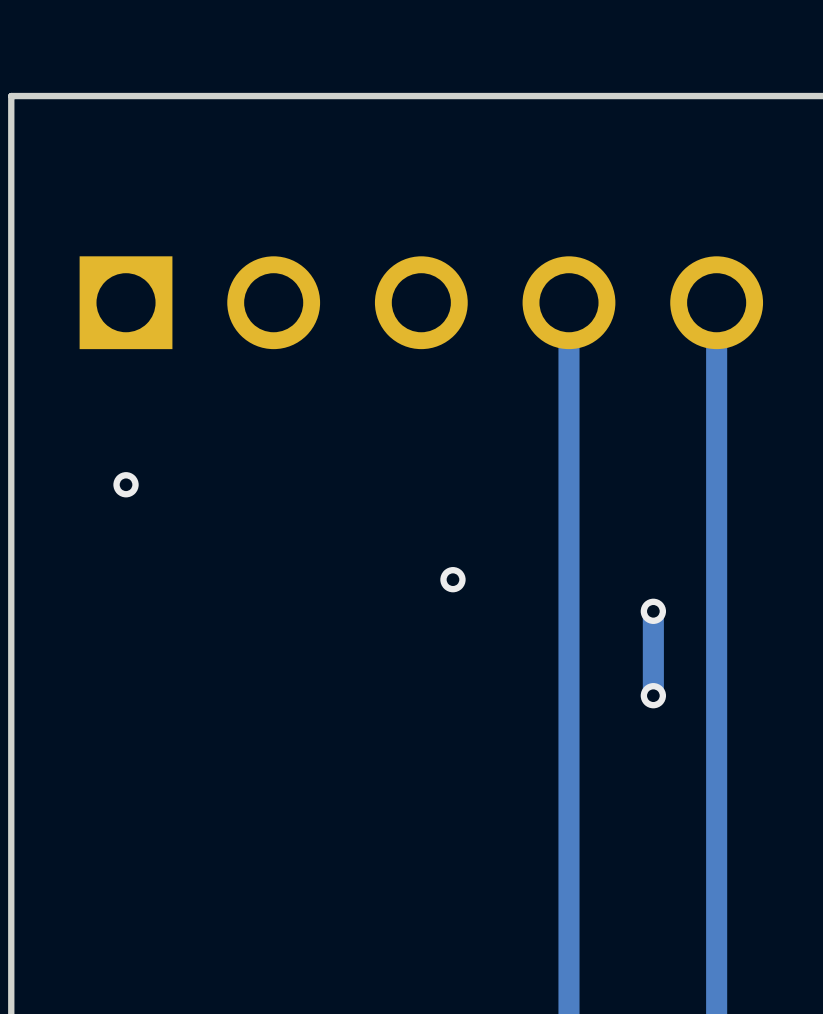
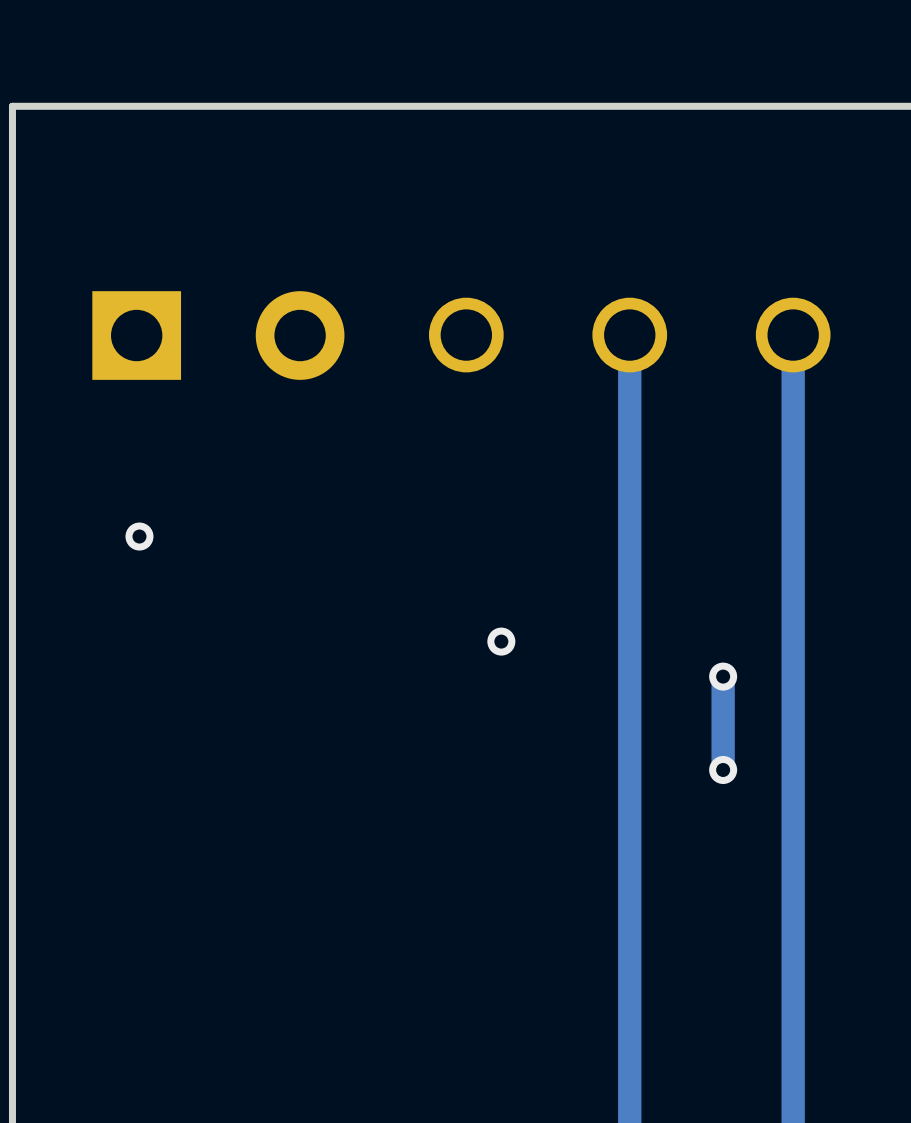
part: (421, 302) -> none
part: none -> (629, 335)
part: none -> (218, 335)

